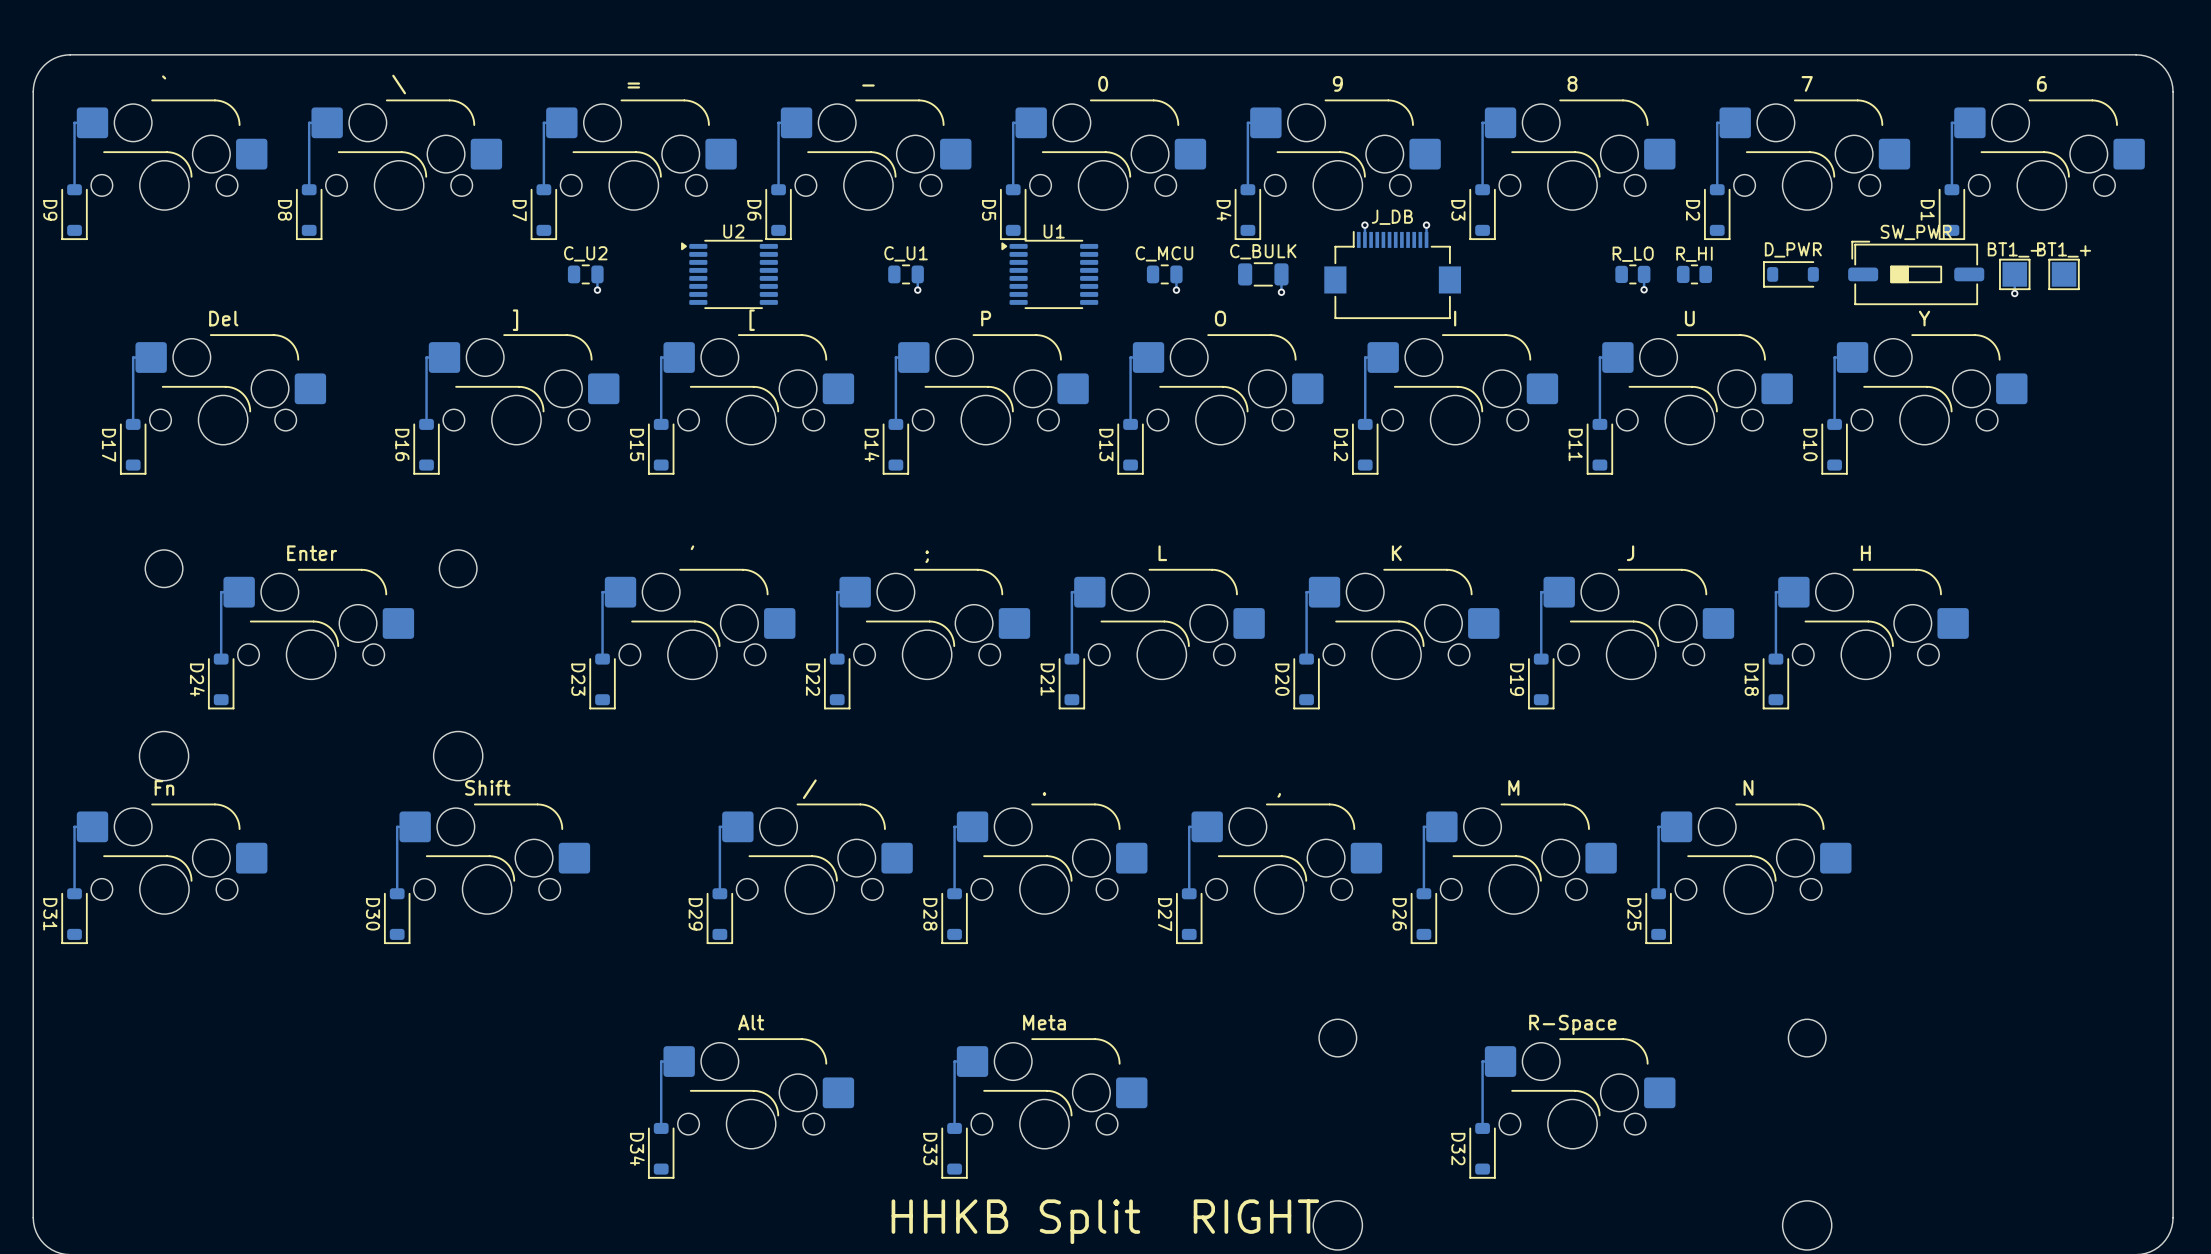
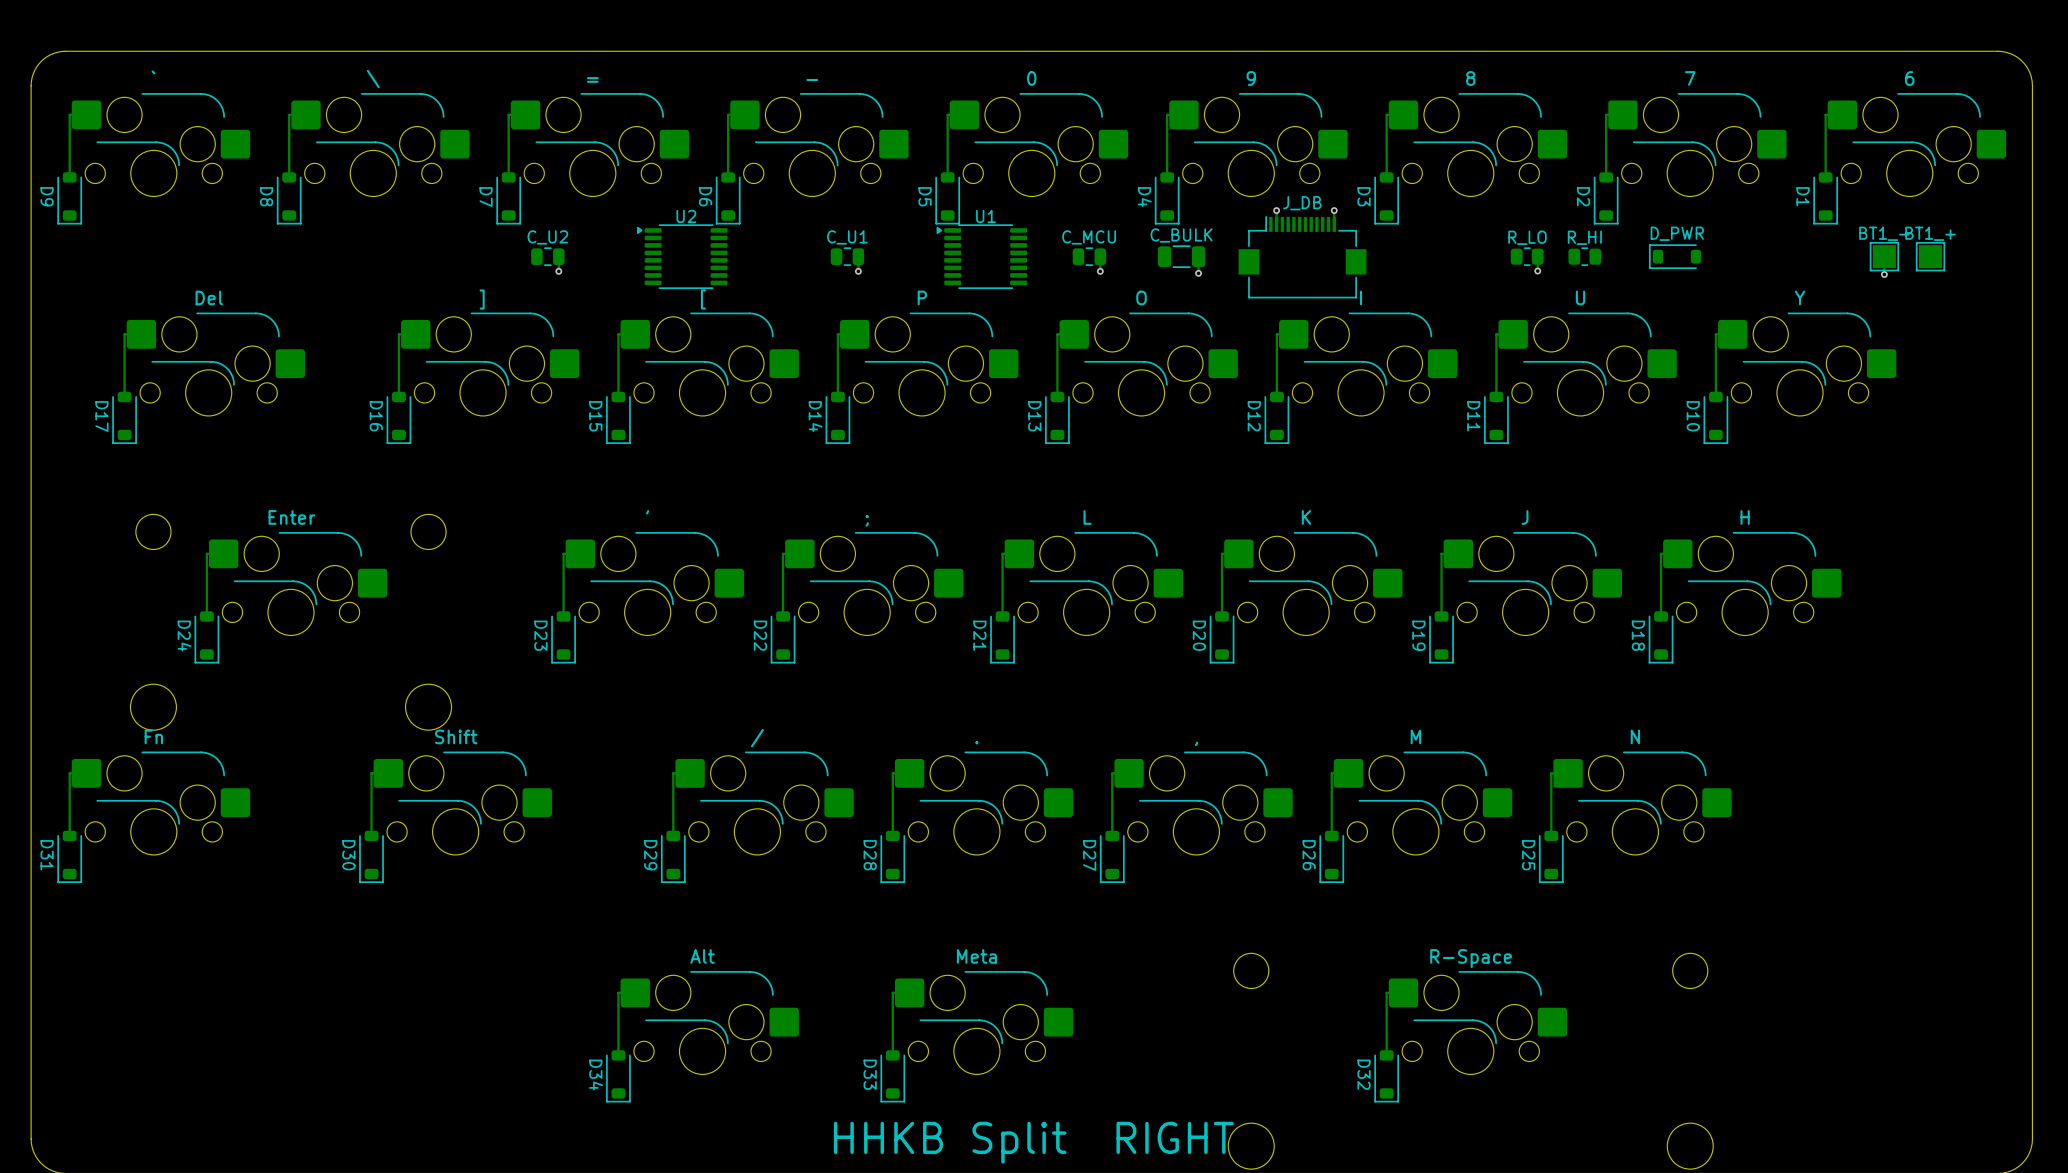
SW_PWR: (1916, 272) -> none

